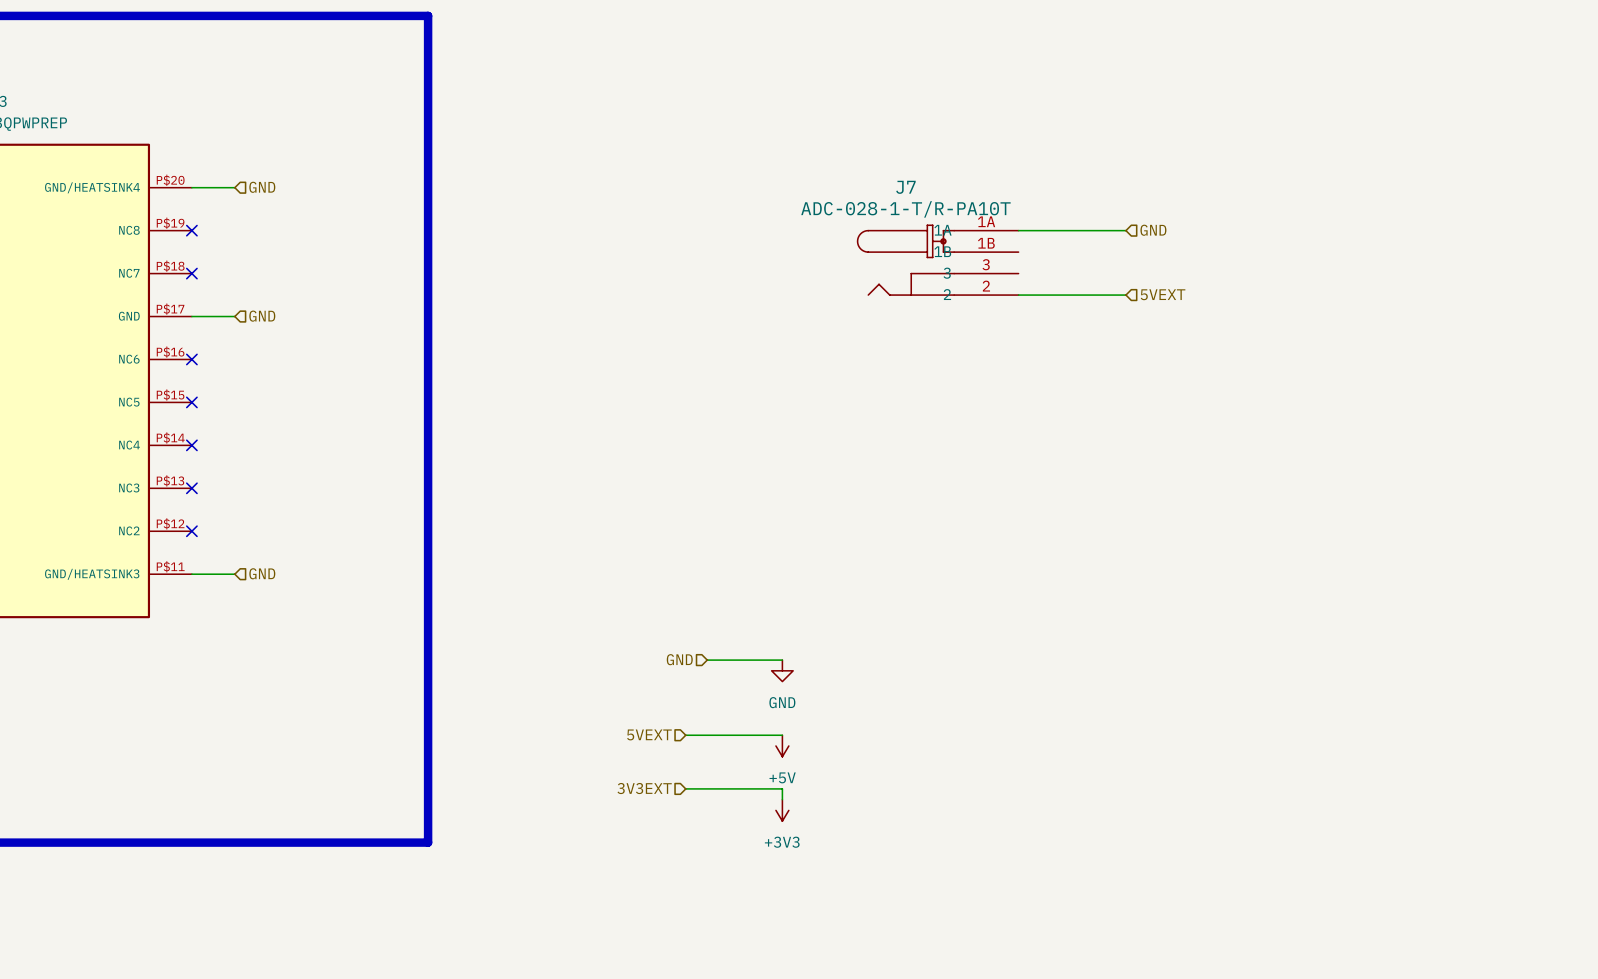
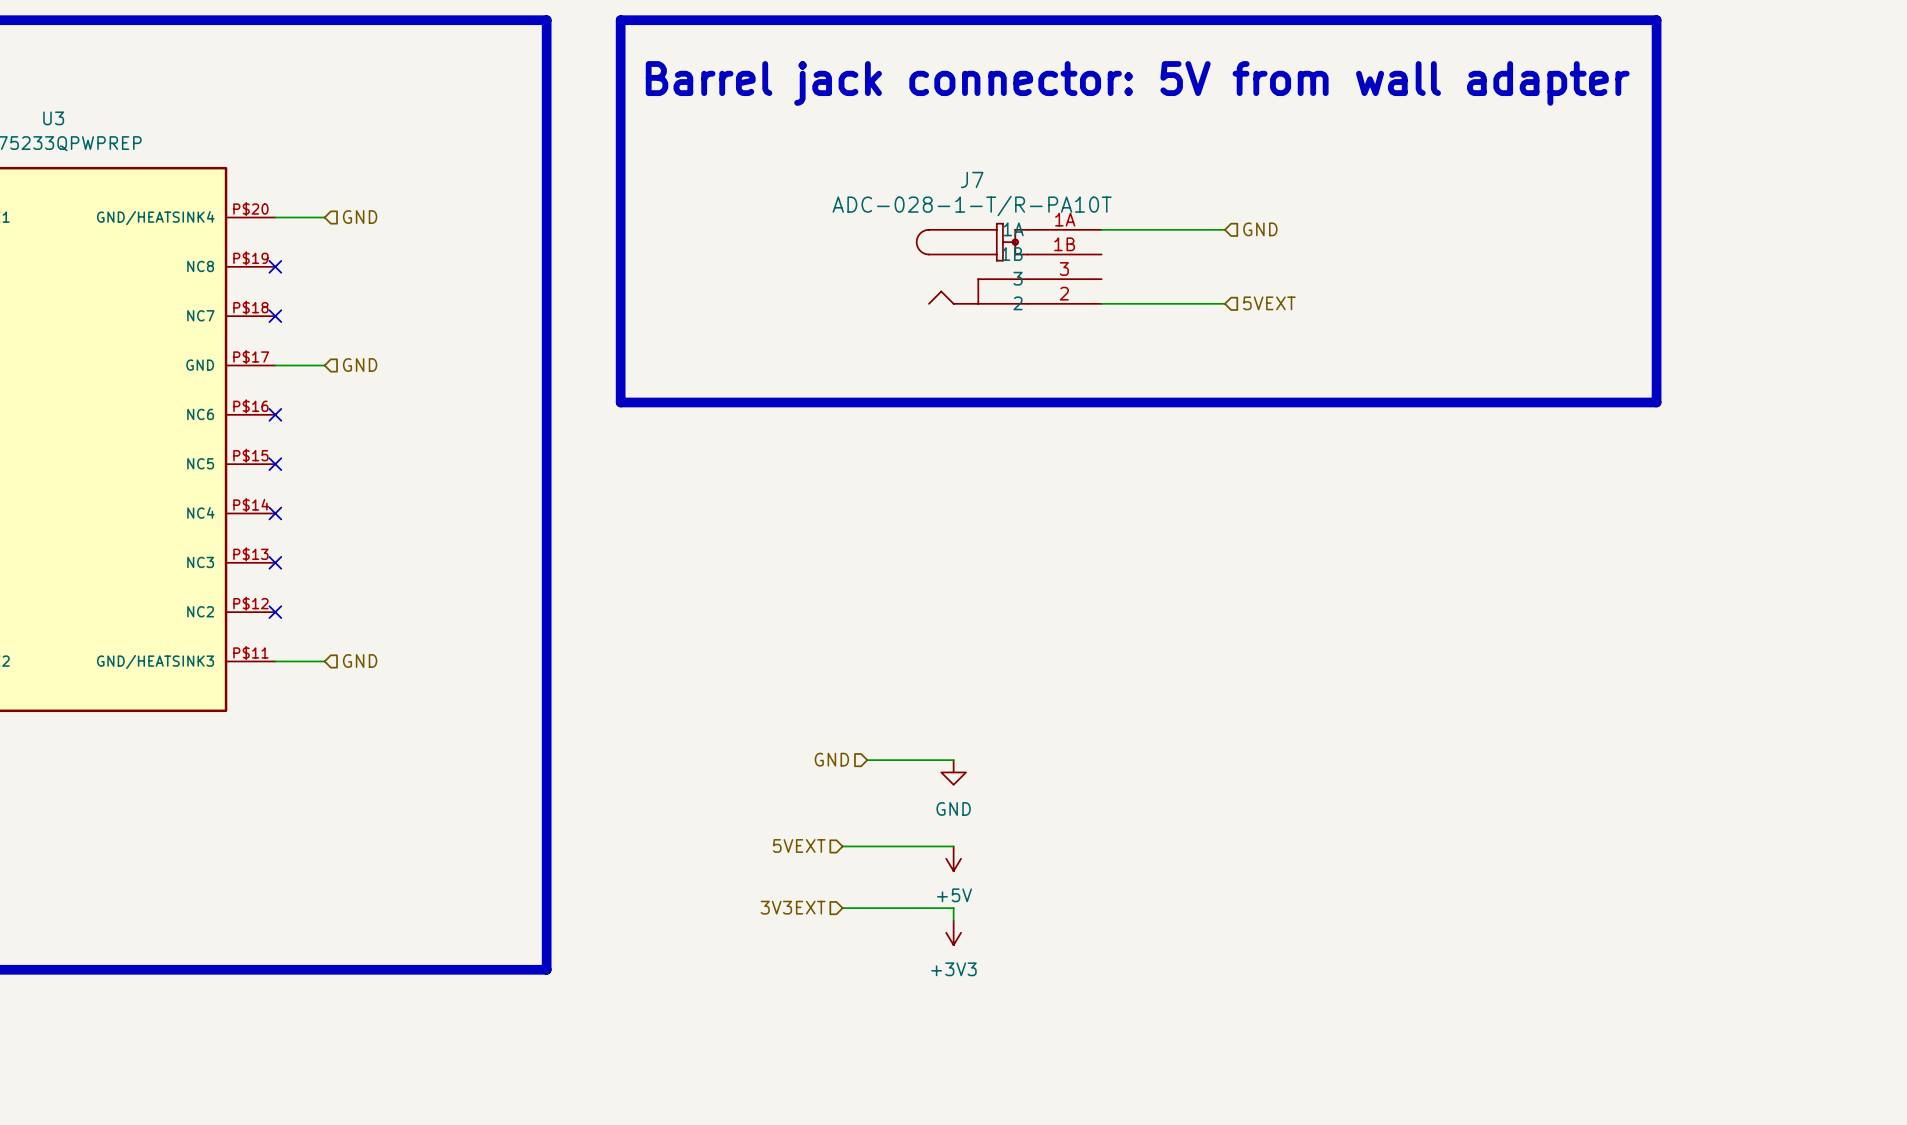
line: none -> (620, 20) (1656, 20) (1656, 402) (620, 402) (620, 20)
text: none -> Barrel jack connector: 5V from wall adapter (1137, 83)
wire: (1018, 230) (1125, 230) -> (1101, 229) (1224, 229)
hierarchical label position: GND (1153, 230) -> GND (1260, 229)
J7 position: (937, 260) -> (1008, 263)
hierarchical label position: 5VEXT (1163, 294) -> 5VEXT (1269, 303)
wire: (1018, 295) (1125, 295) -> (1101, 303) (1224, 303)

